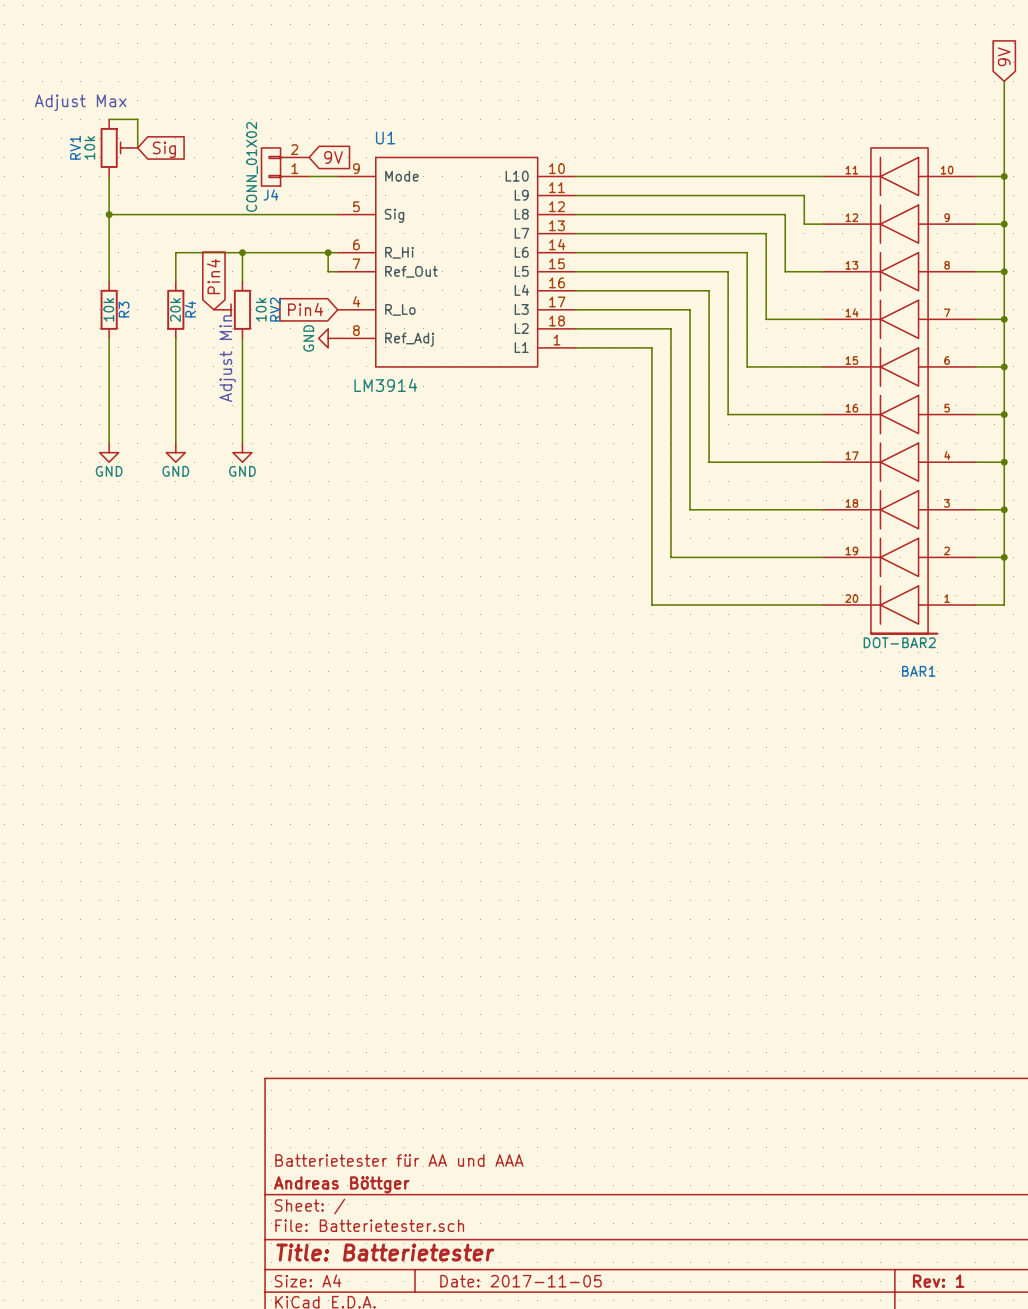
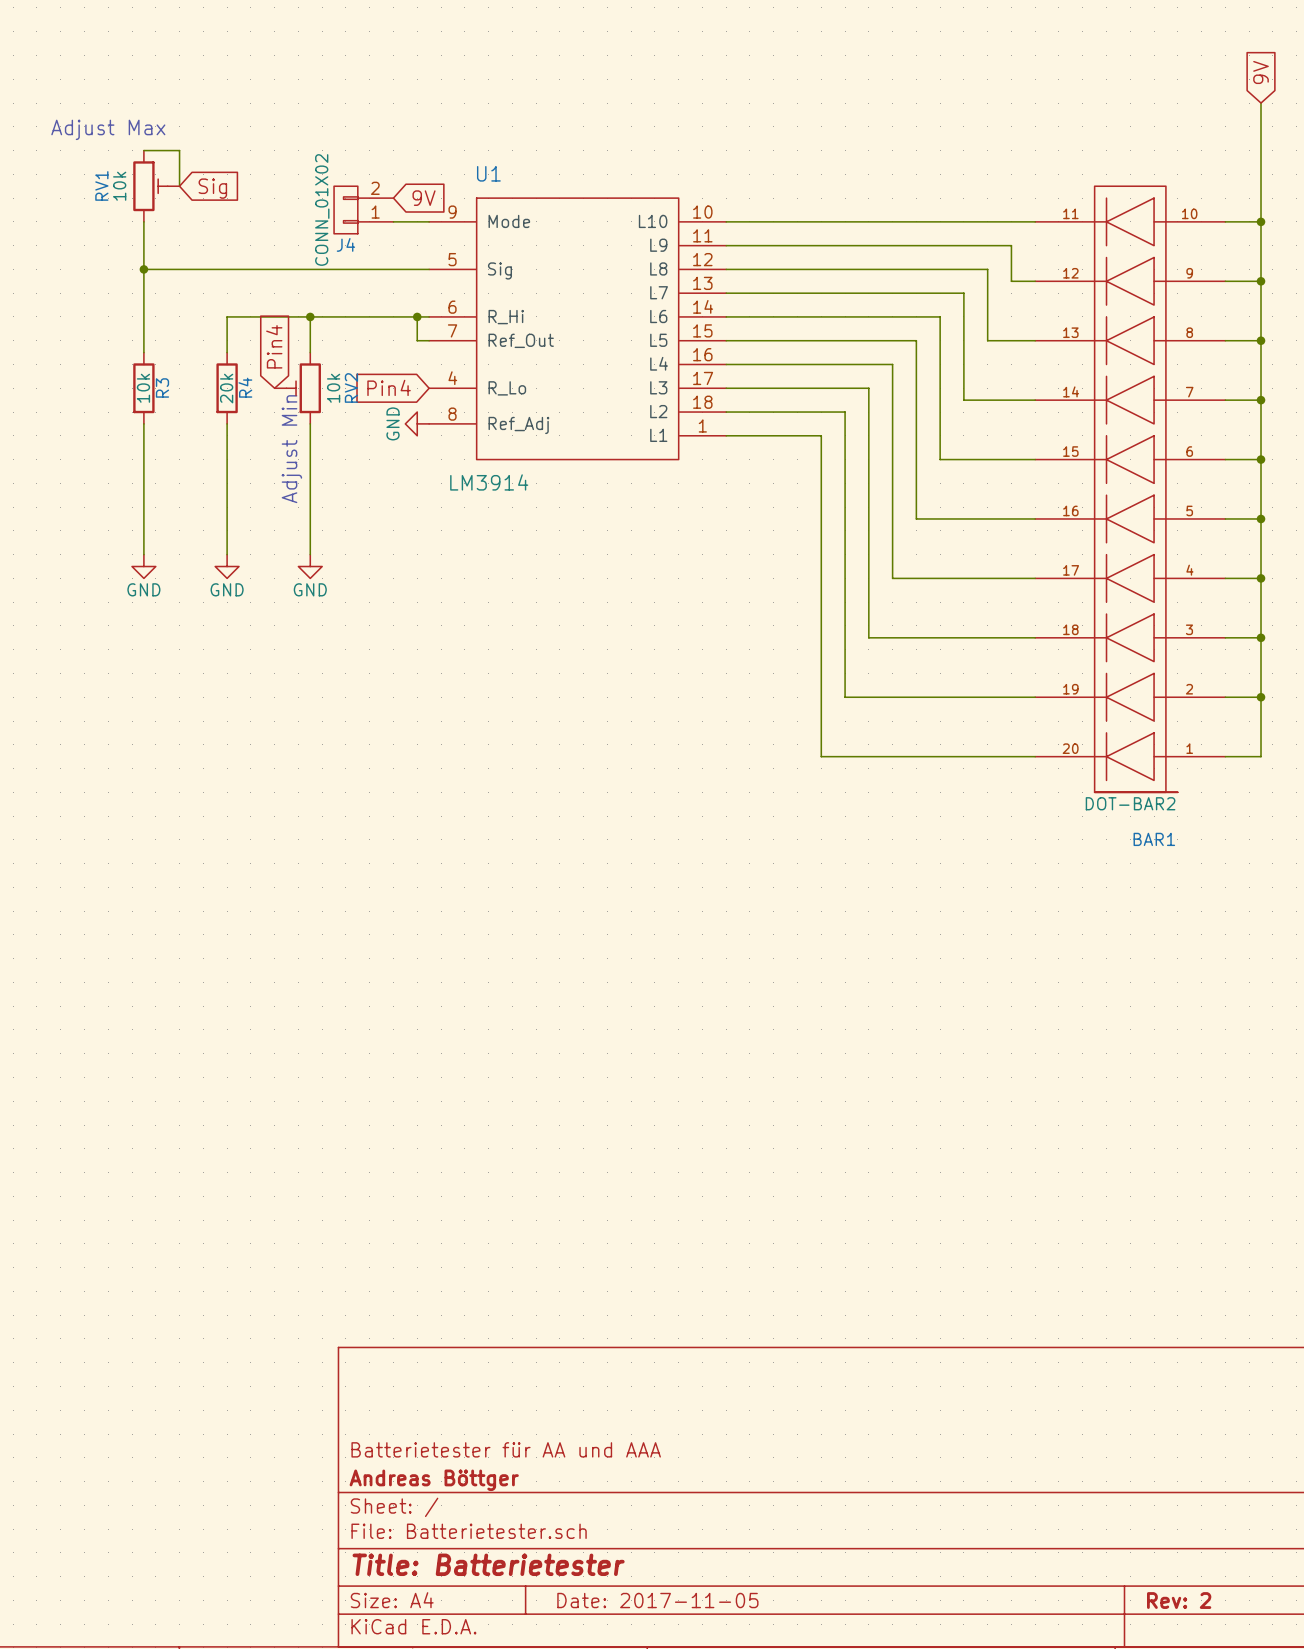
title block: Rev: 1 (938, 1281) -> Rev: 2 (1179, 1600)

